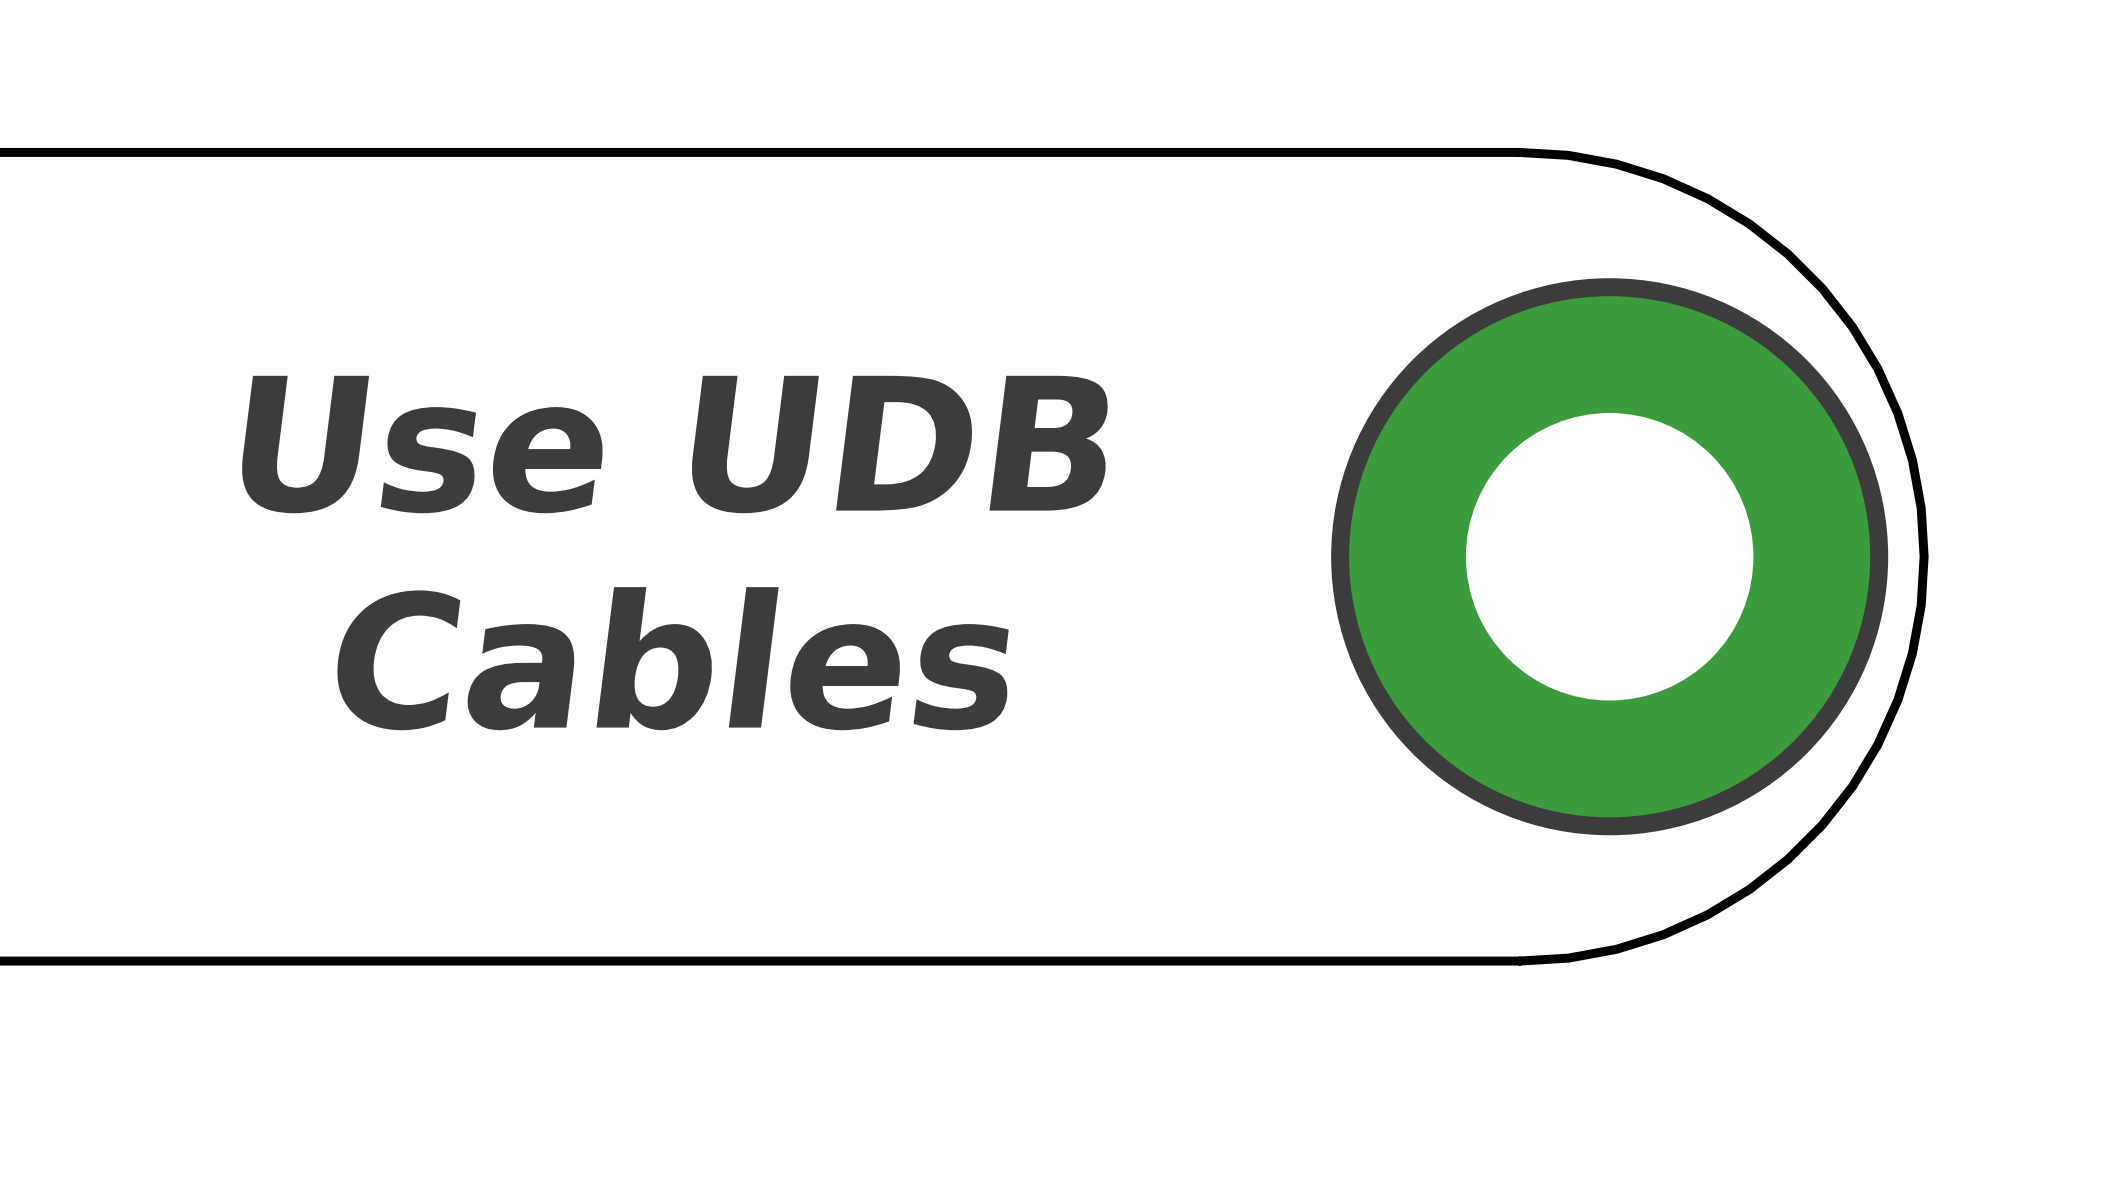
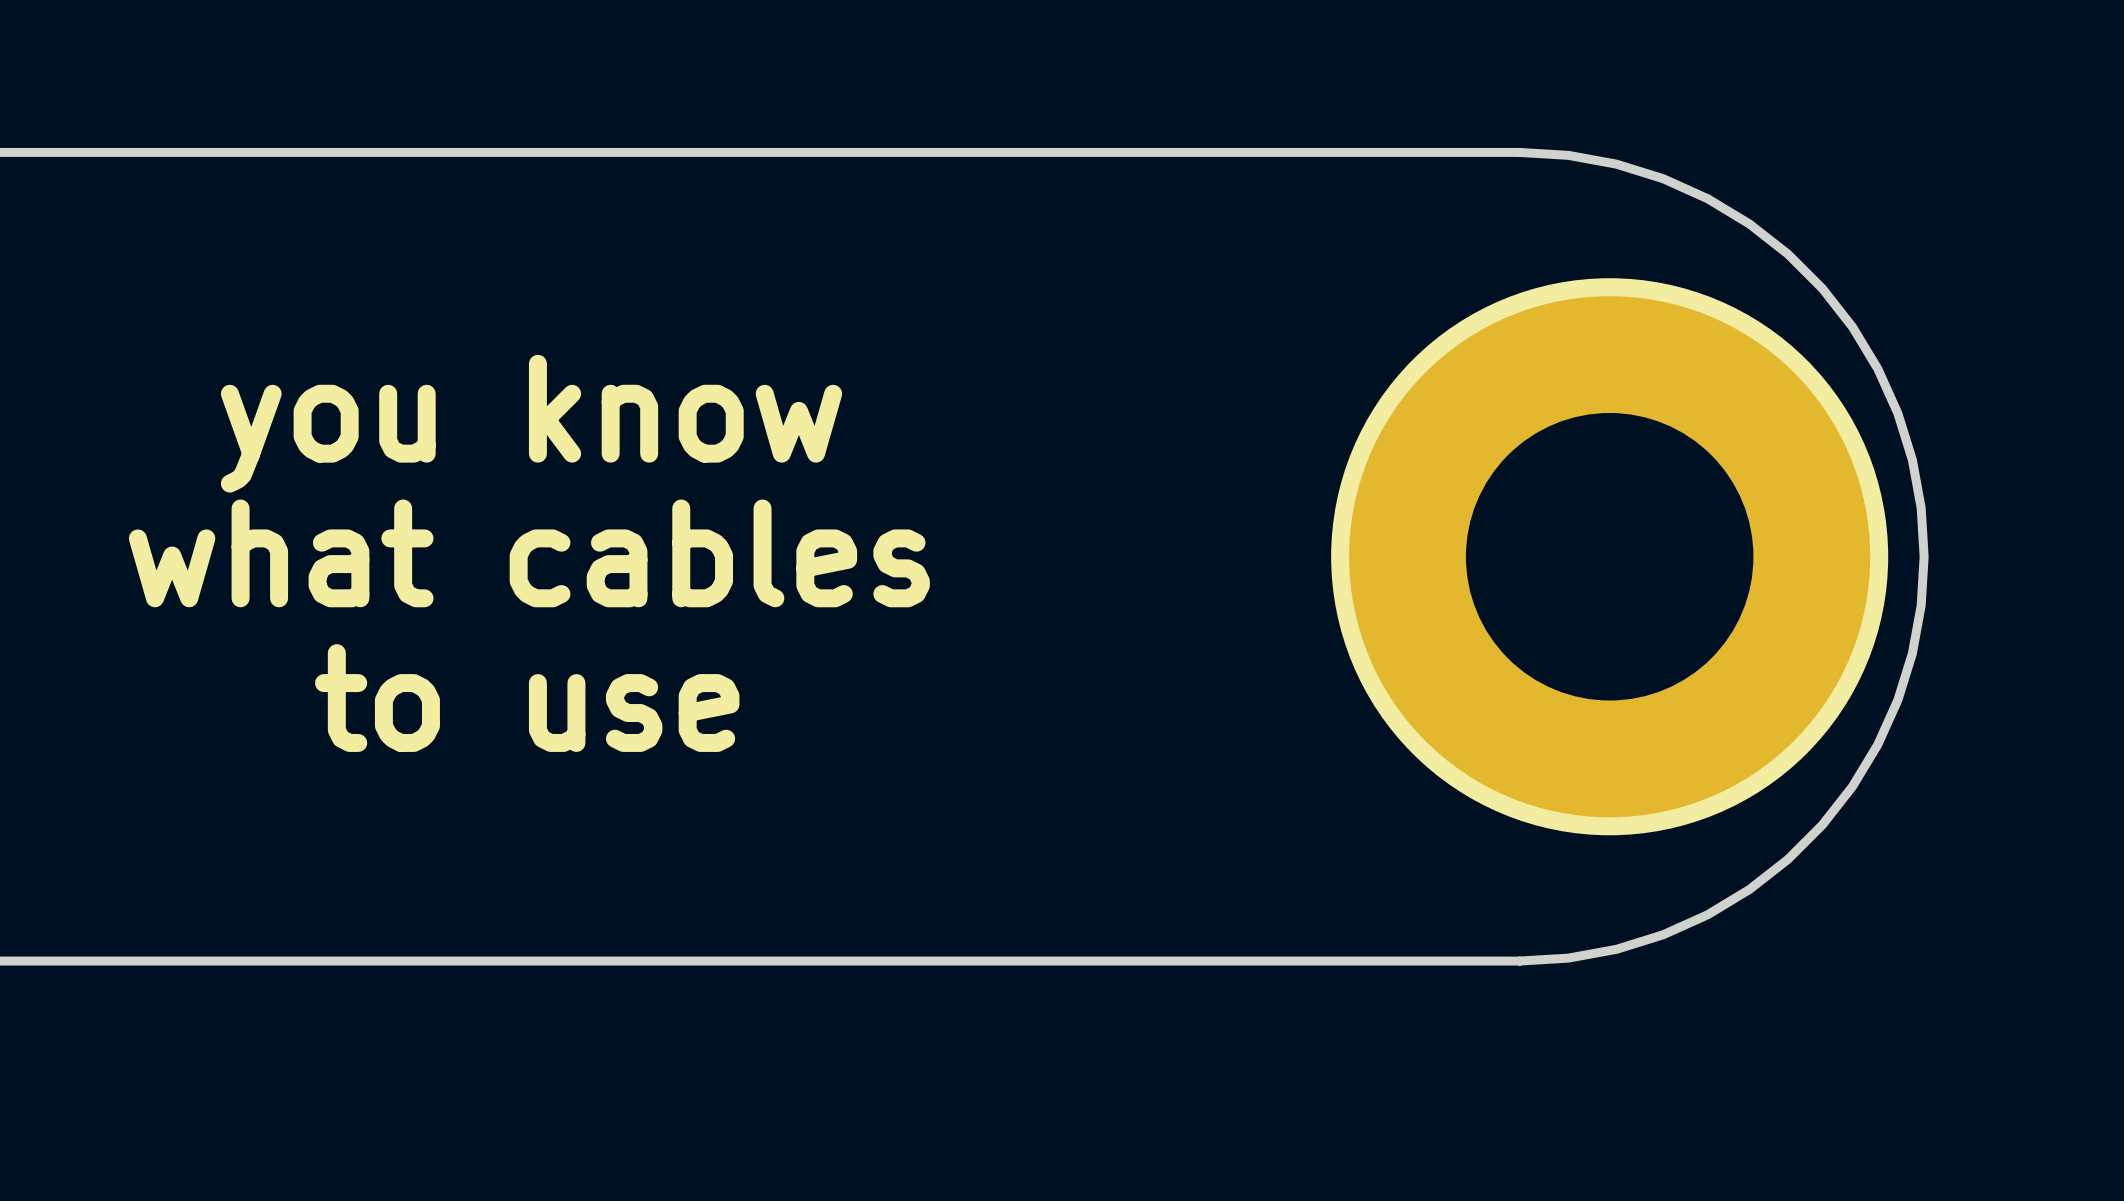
text: none -> you know (531, 423)
text: Use UDB (674, 444) -> none
text: none -> what cables (529, 553)
text: Cables (671, 658) -> none
text: none -> to use (527, 698)

